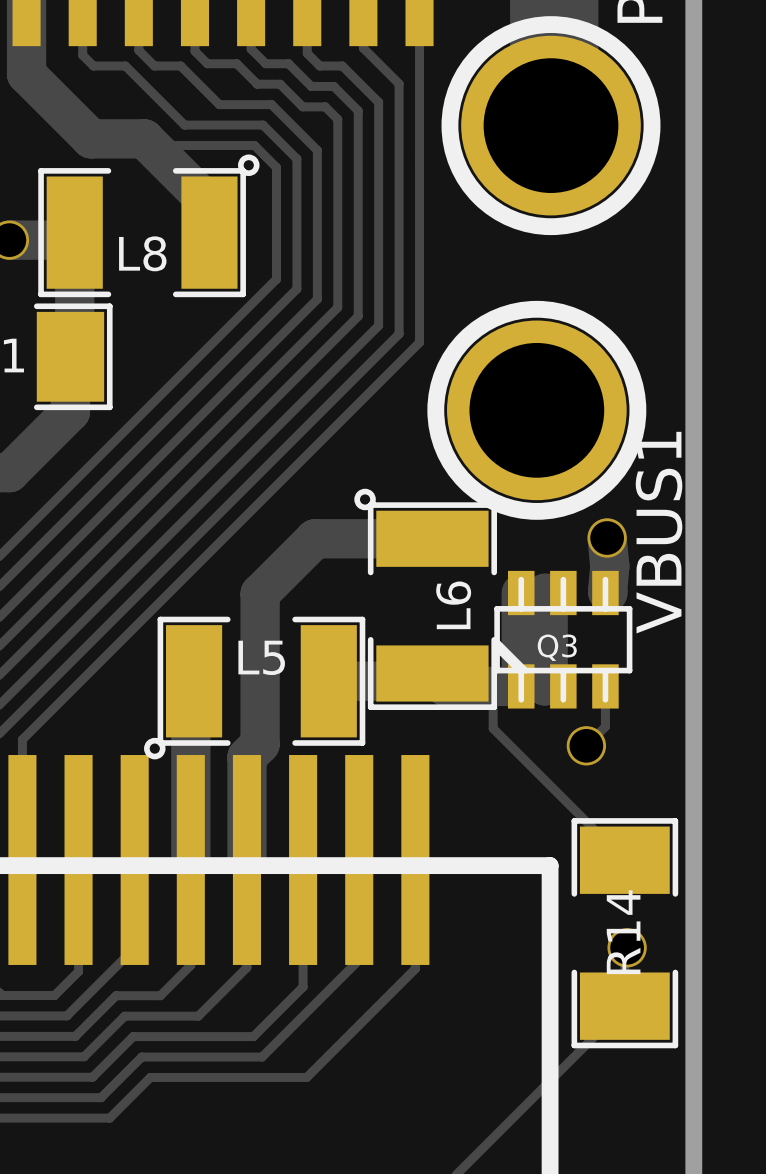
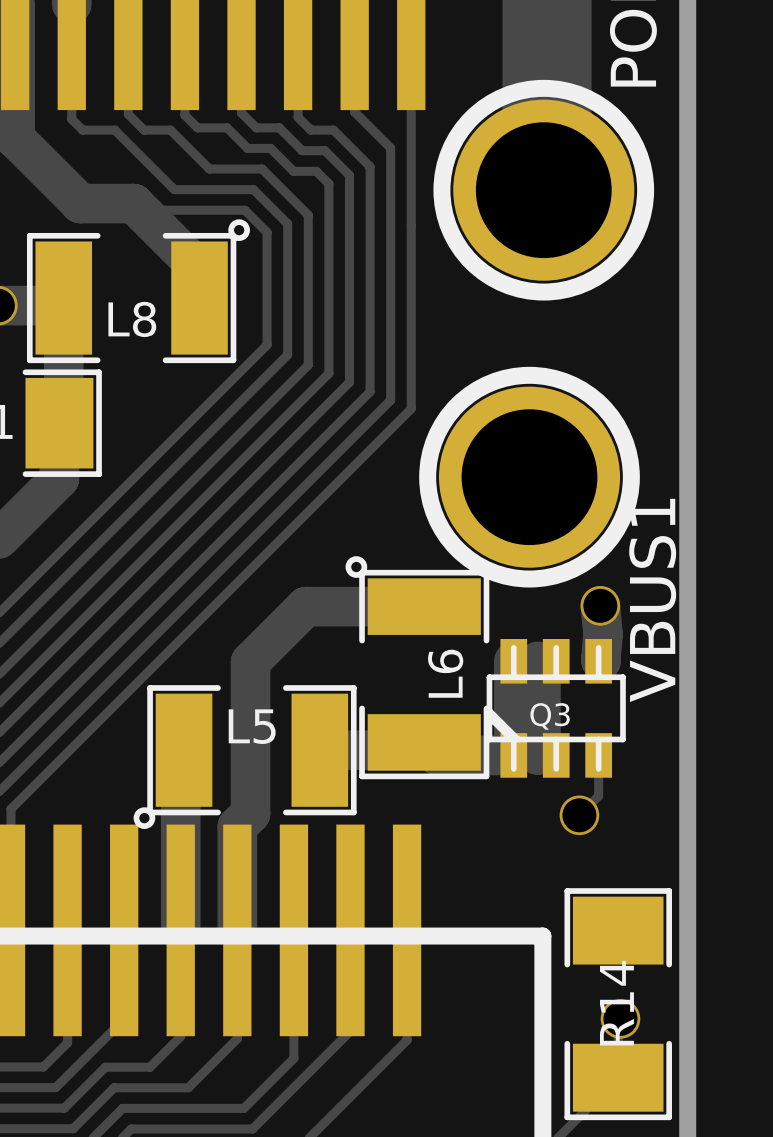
track: (493, 686) (493, 728) (624, 860) -> none

